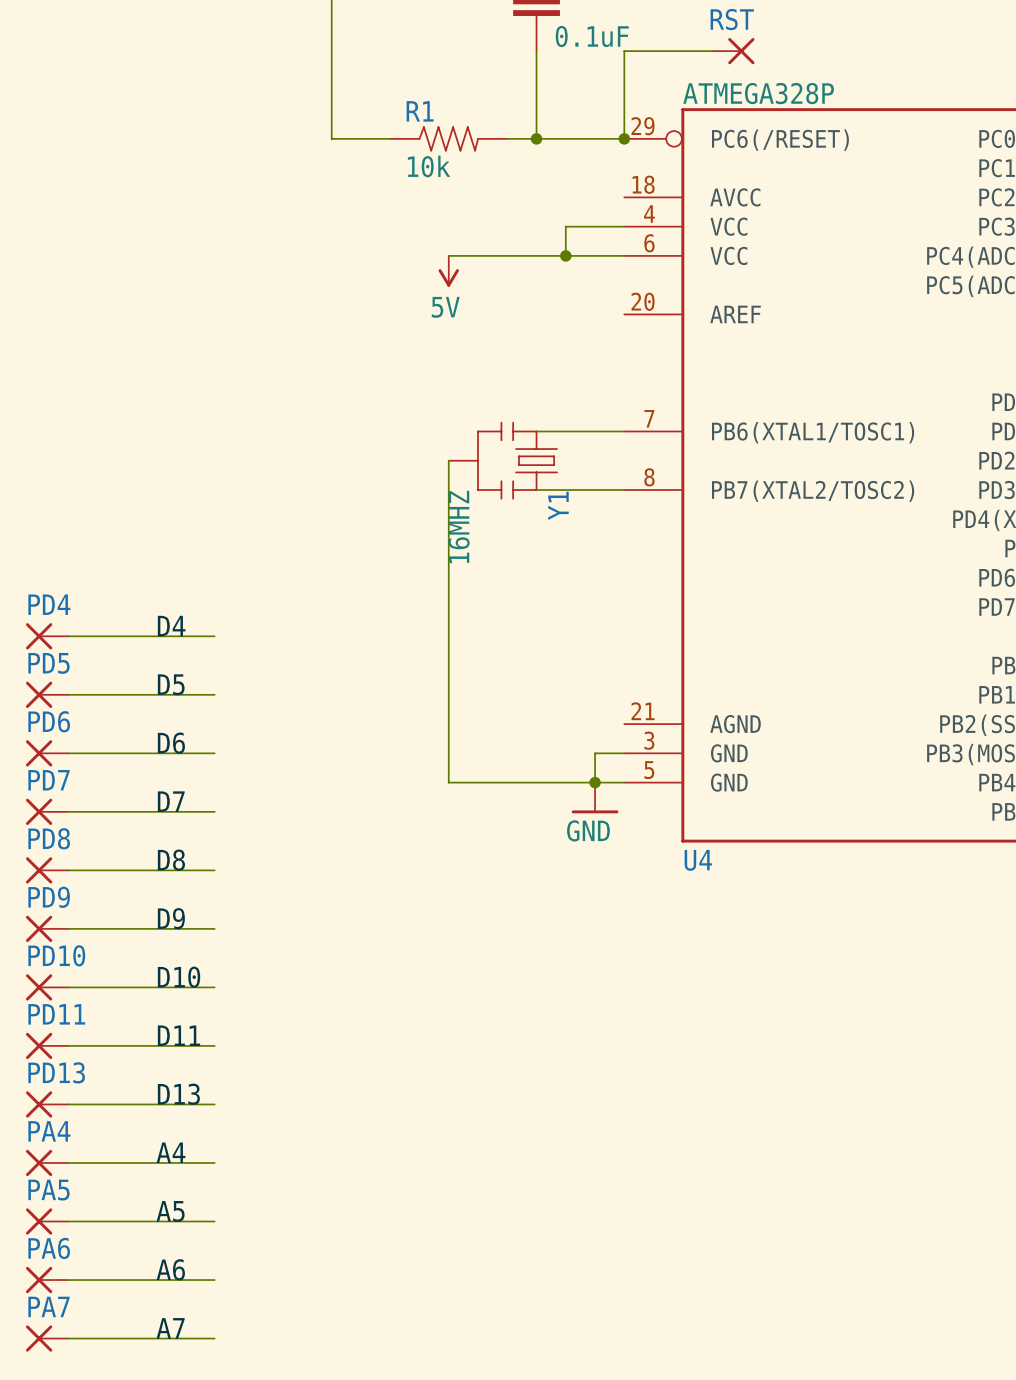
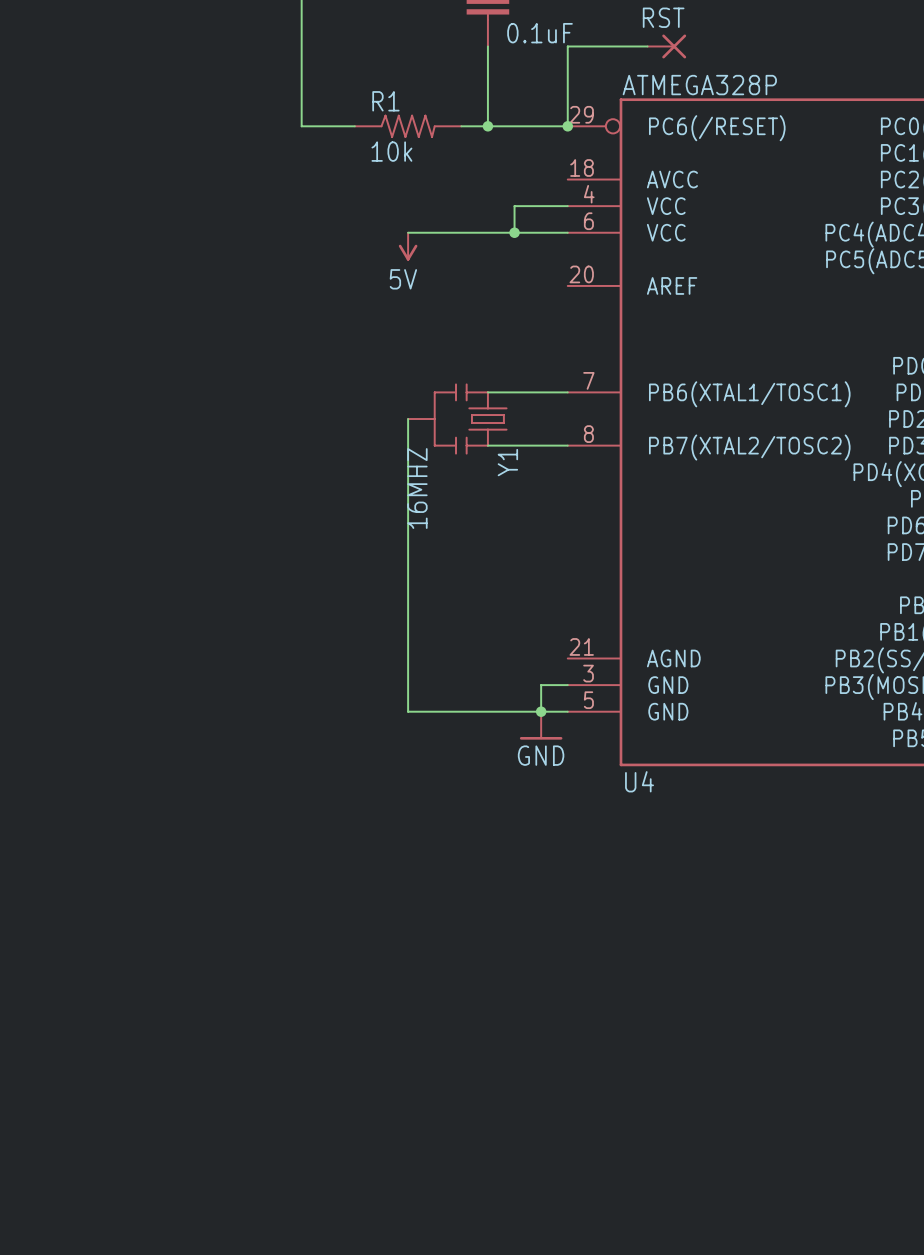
label: D4 (171, 626) -> none
PD4: (47, 636) -> none
wire: (68, 636) (214, 636) -> none
label: D5 (171, 684) -> none
PD5: (47, 694) -> none
wire: (68, 694) (214, 694) -> none
label: D6 (171, 743) -> none
PD6: (47, 753) -> none
wire: (68, 753) (214, 753) -> none
label: D7 (171, 801) -> none
PD7: (47, 811) -> none
wire: (68, 811) (214, 811) -> none
label: D8 (171, 860) -> none
PD8: (47, 870) -> none
wire: (68, 870) (214, 870) -> none
label: D9 (171, 918) -> none
PD9: (47, 928) -> none
wire: (68, 928) (214, 928) -> none
label: D10 (179, 977) -> none
PD10: (47, 987) -> none
wire: (68, 987) (214, 987) -> none
label: D11 (178, 1035) -> none
PD11: (47, 1045) -> none
wire: (68, 1045) (214, 1045) -> none
label: D13 (178, 1094) -> none
PD13: (47, 1104) -> none
wire: (68, 1104) (214, 1104) -> none
label: A4 (171, 1152) -> none
PA4: (47, 1162) -> none
wire: (68, 1162) (214, 1162) -> none
label: A5 (170, 1211) -> none
PA5: (47, 1221) -> none
wire: (68, 1221) (214, 1221) -> none
label: A6 (170, 1269) -> none
PA6: (47, 1280) -> none
wire: (68, 1280) (214, 1280) -> none
label: A7 (170, 1328) -> none
PA7: (47, 1338) -> none
wire: (68, 1338) (214, 1338) -> none

